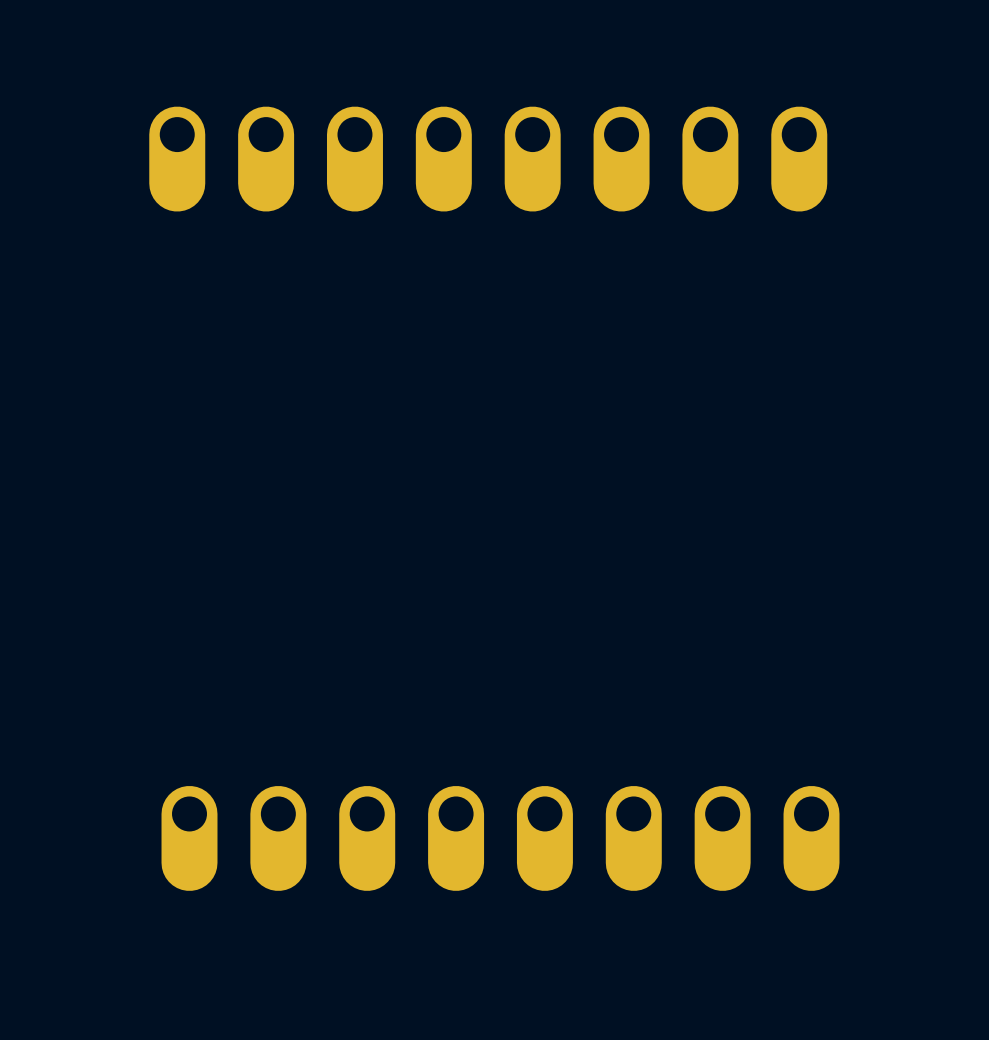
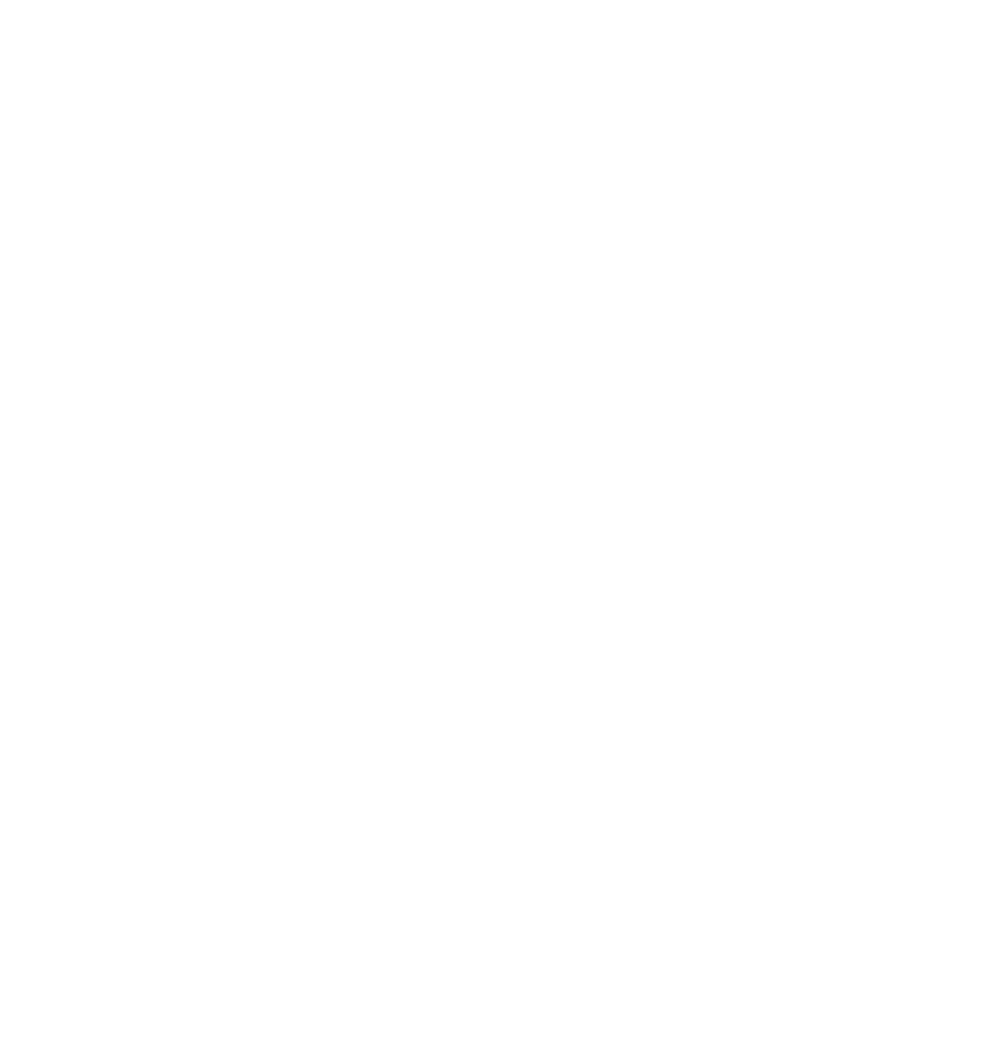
part: (488, 159) -> none
part: (500, 838) -> none

